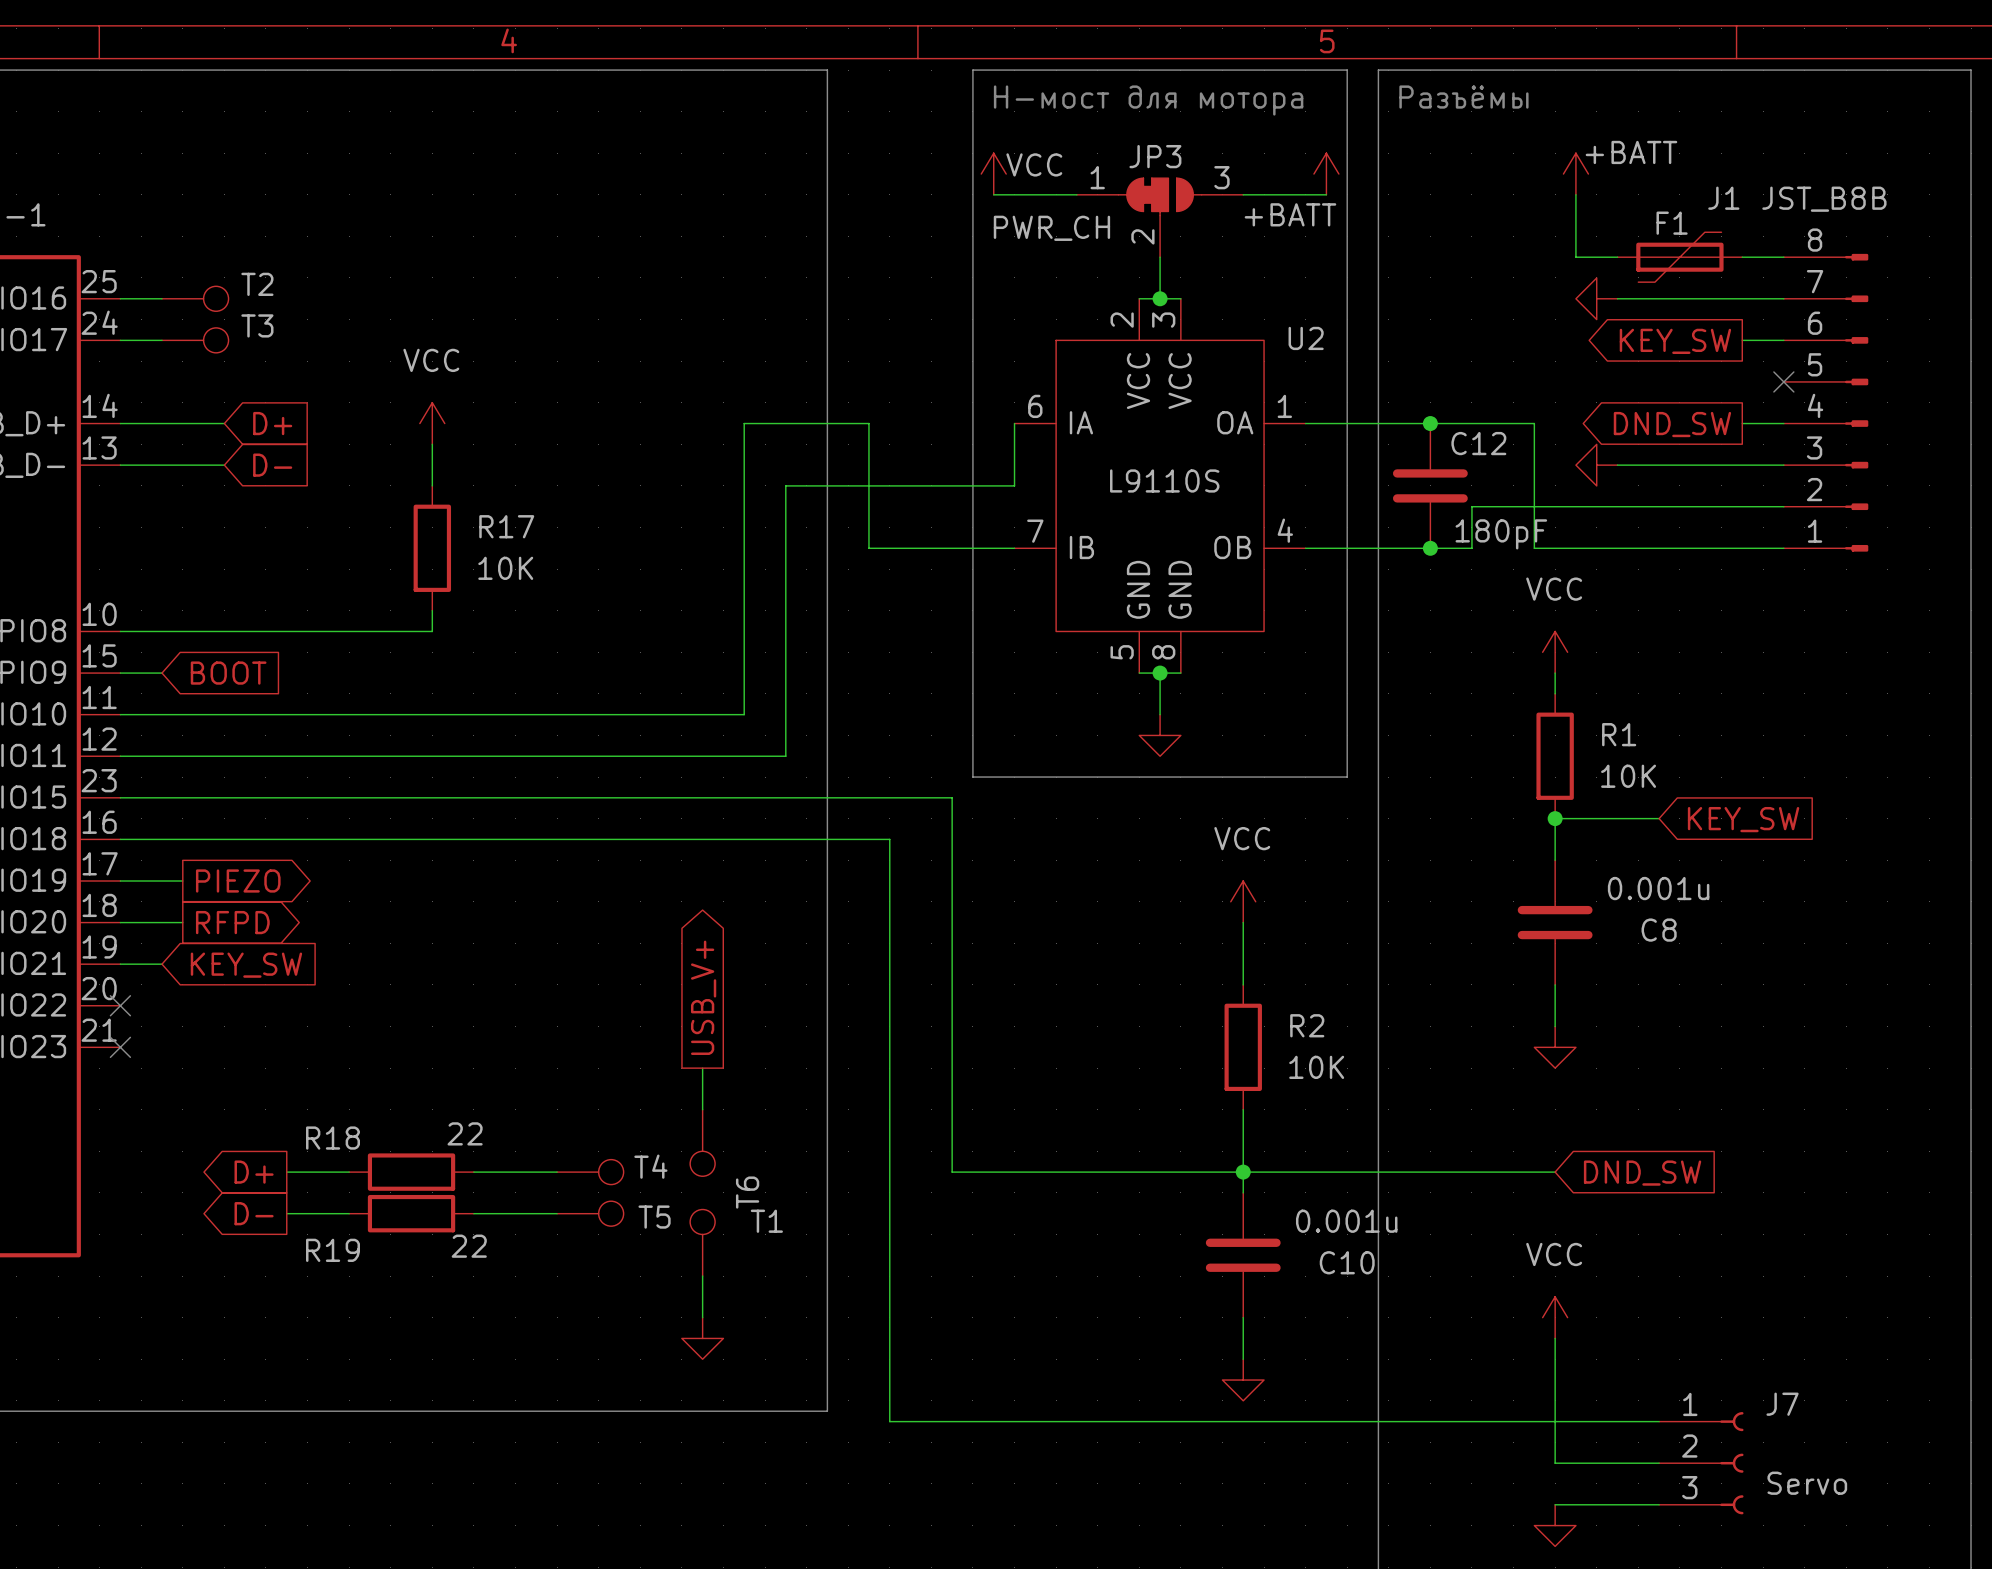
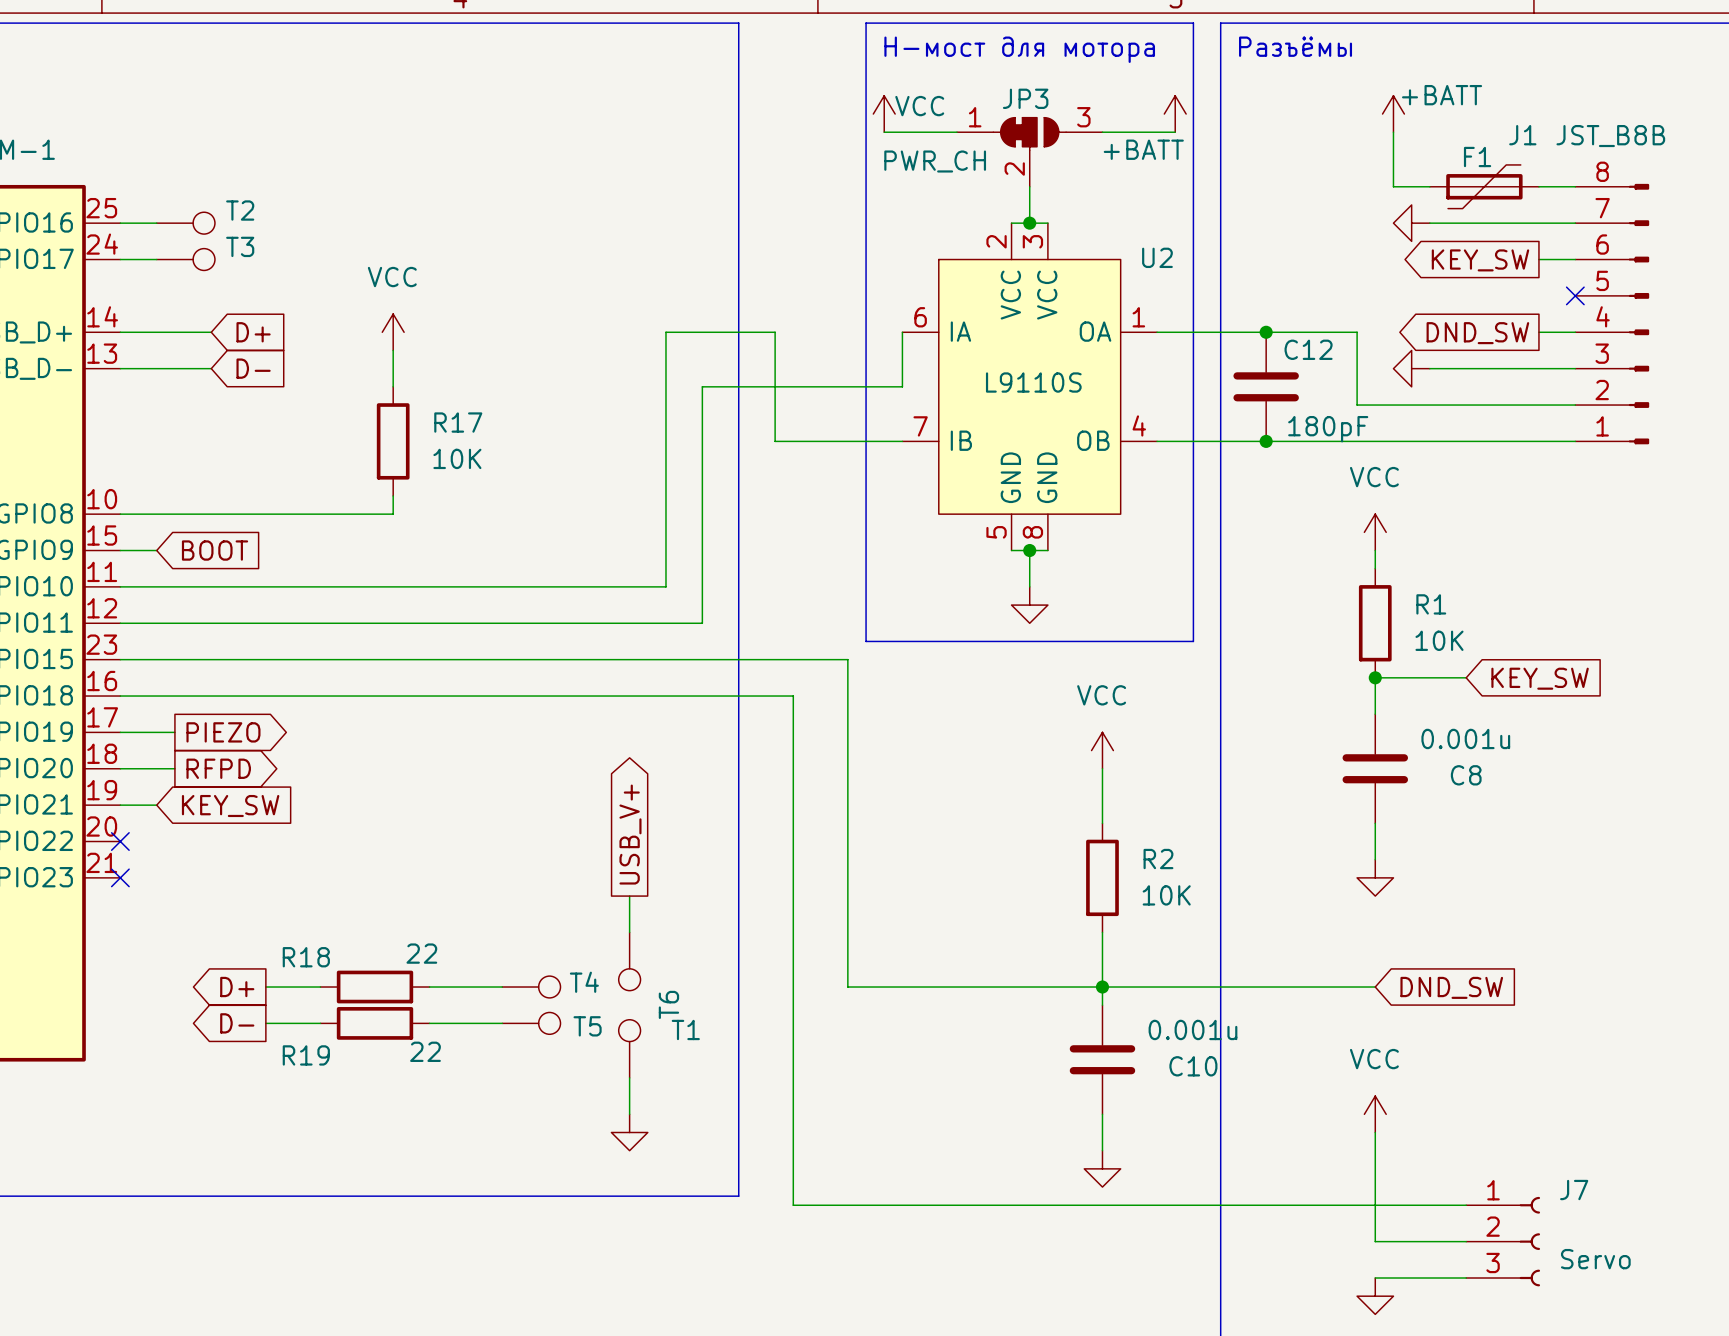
wire: (1471, 548) (1471, 506) (1534, 506) (1534, 548) -> (1302, 441) (1357, 441)

